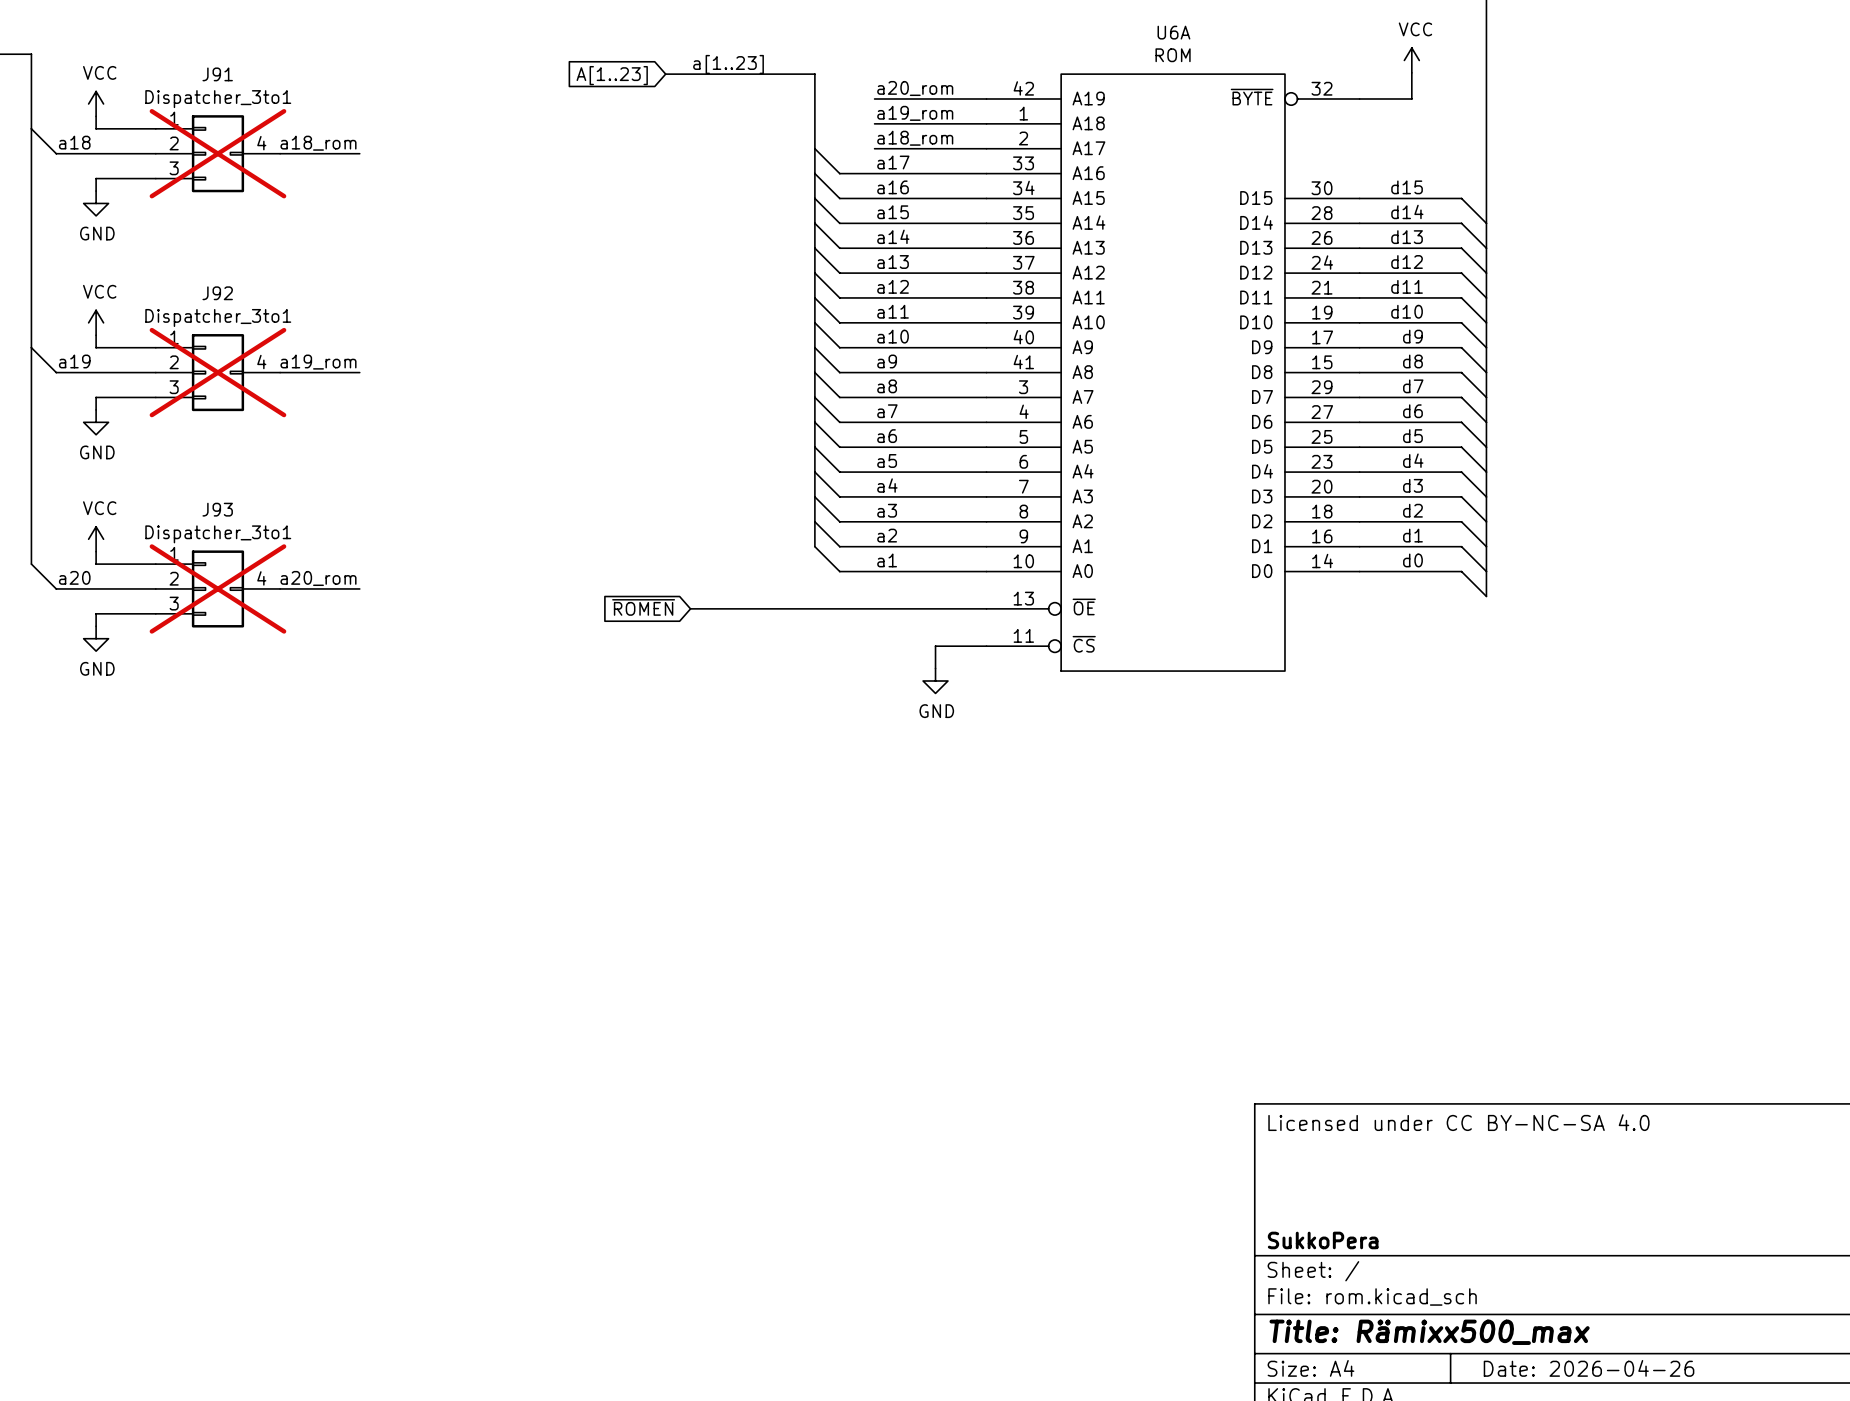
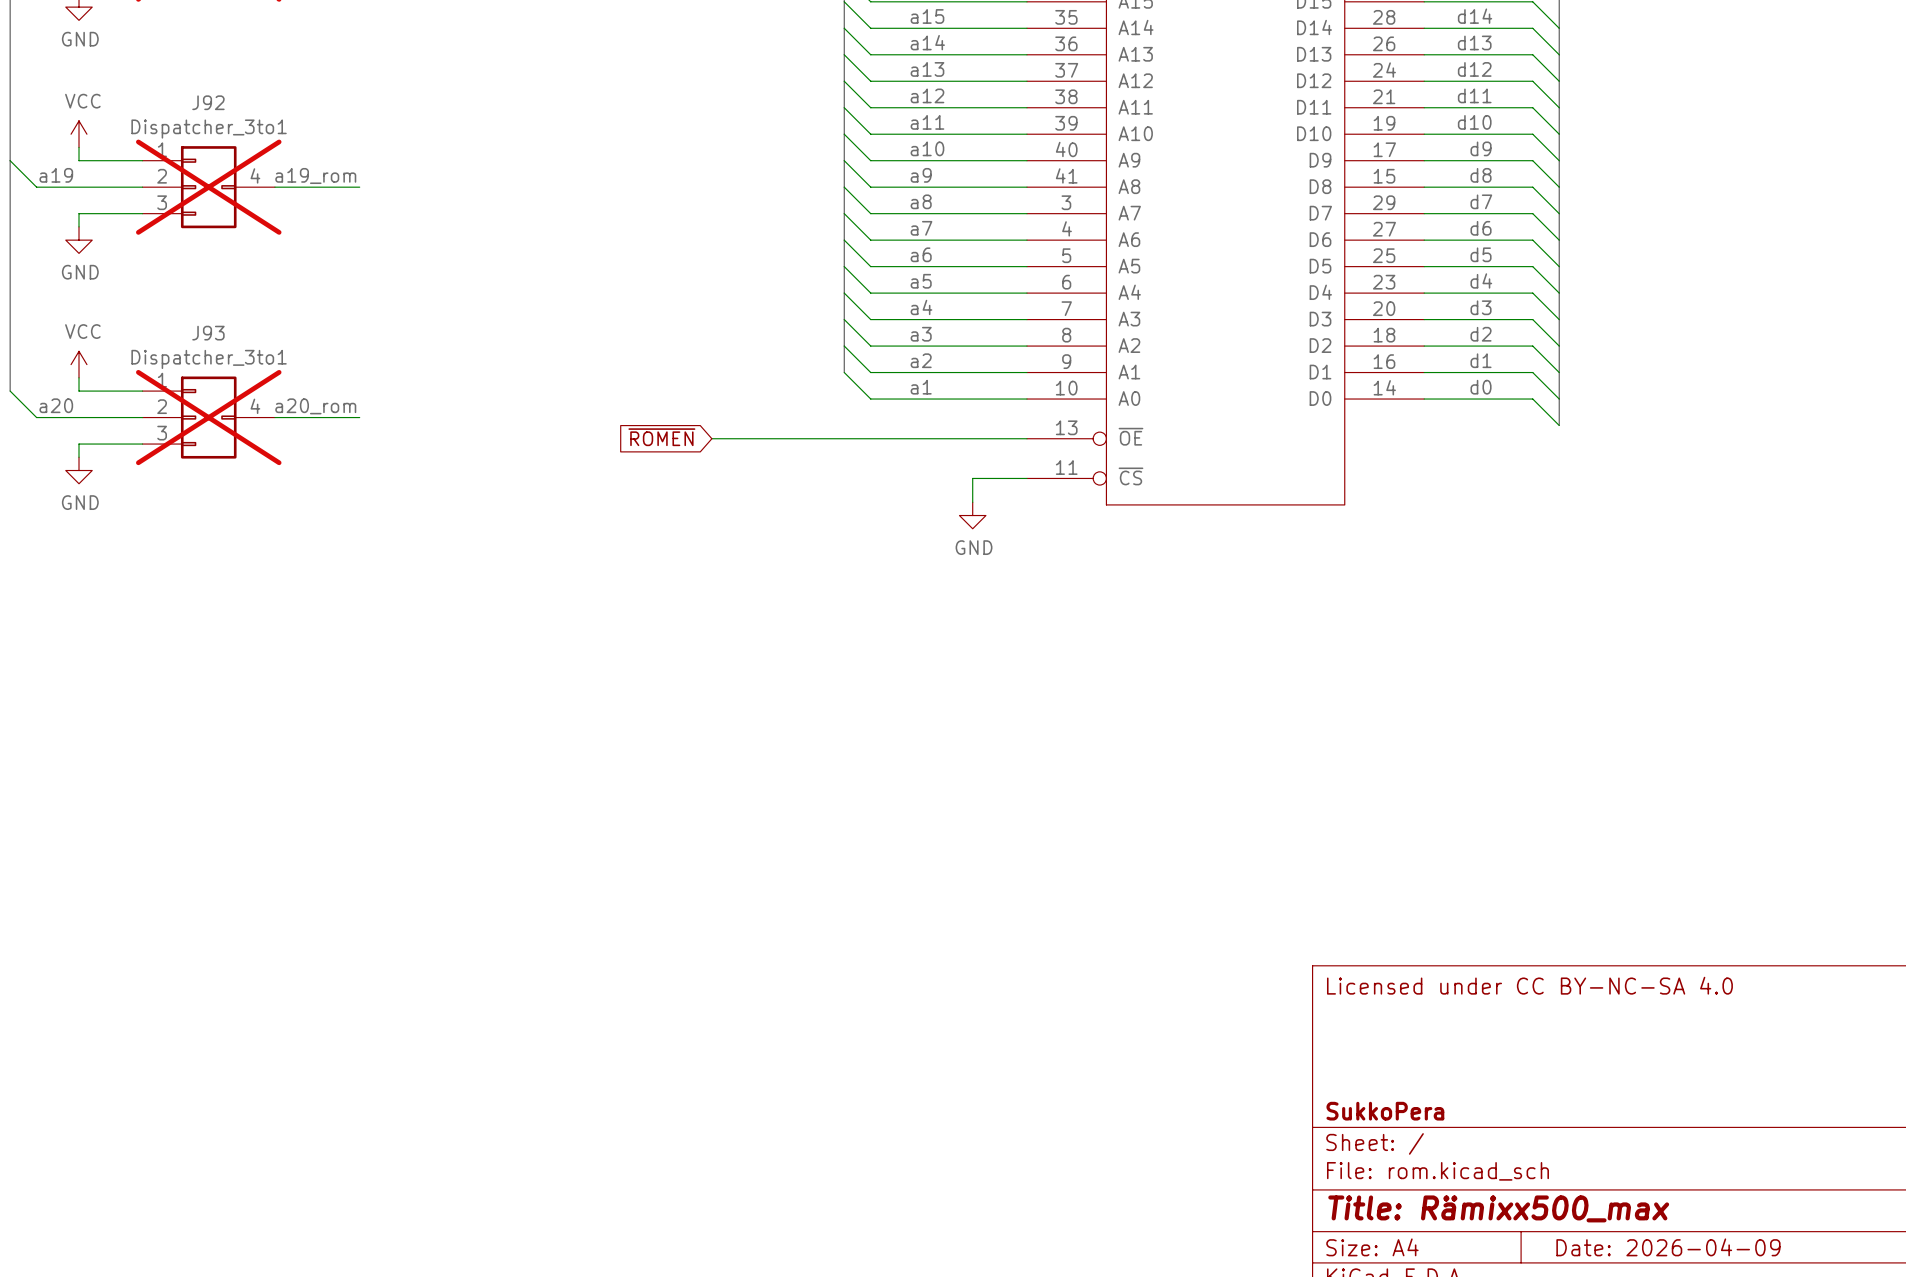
title block: Date: 2026-04-26 (1589, 1368) -> Date: 2026-04-09 (1668, 1247)

